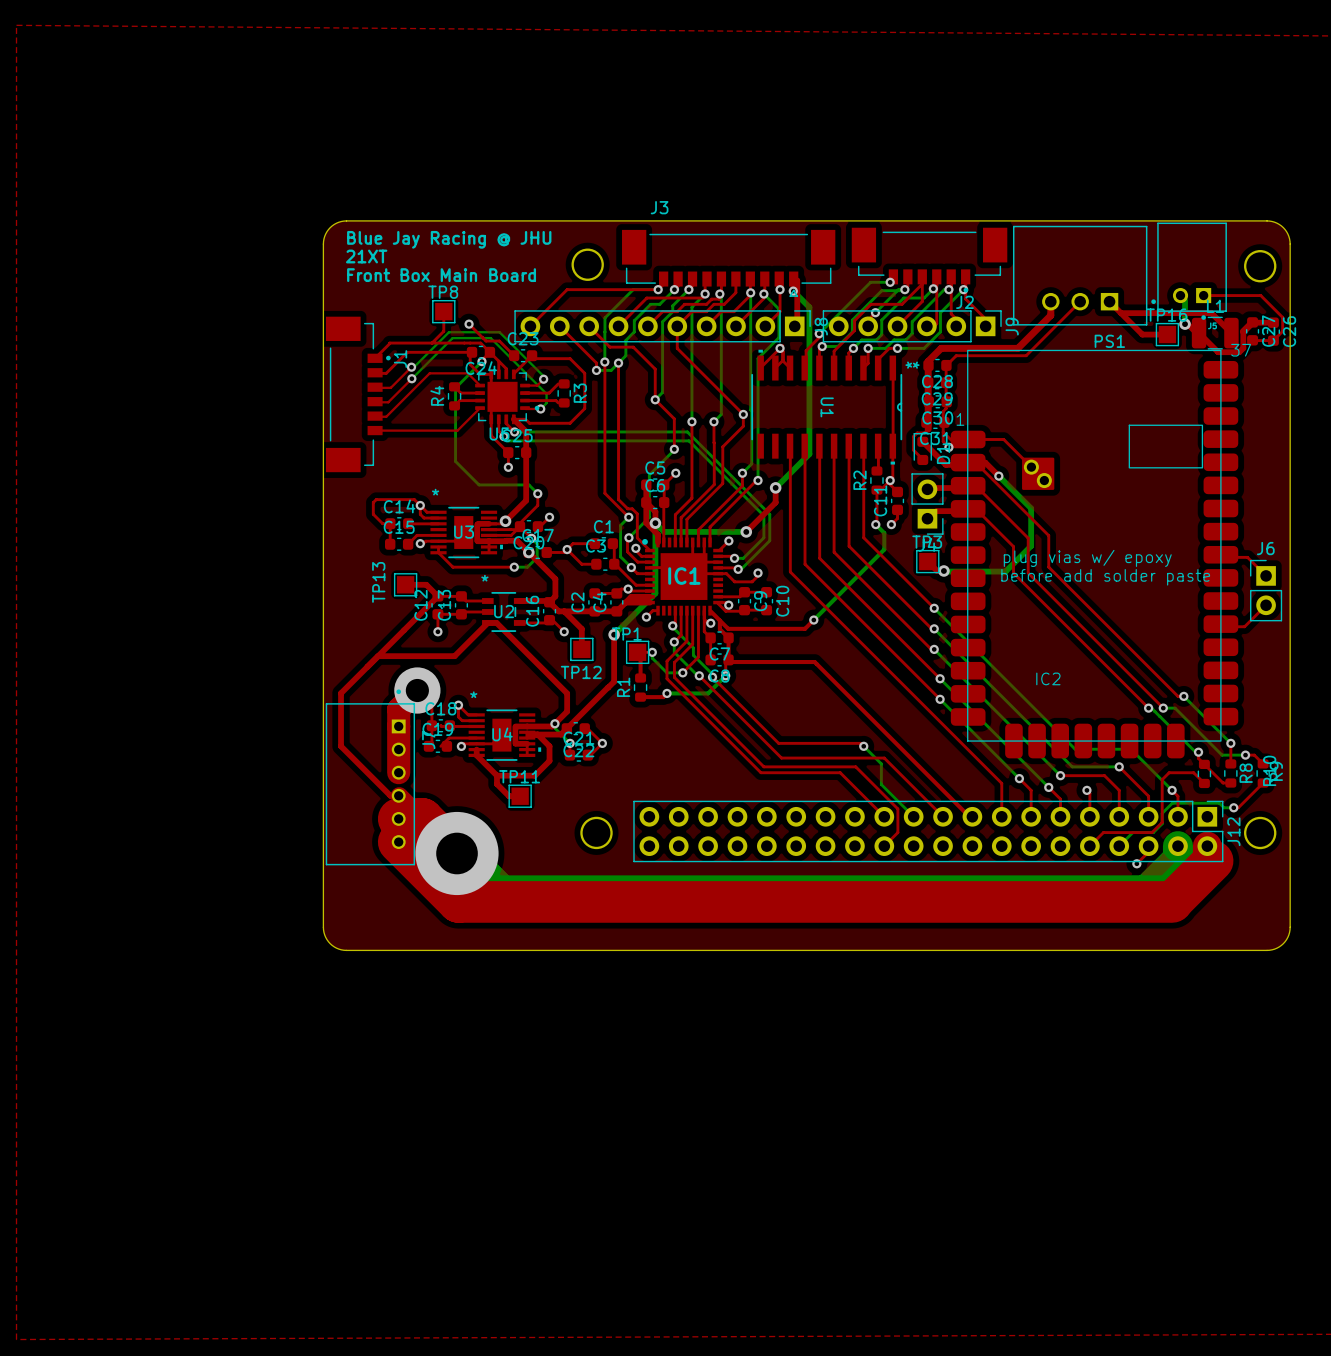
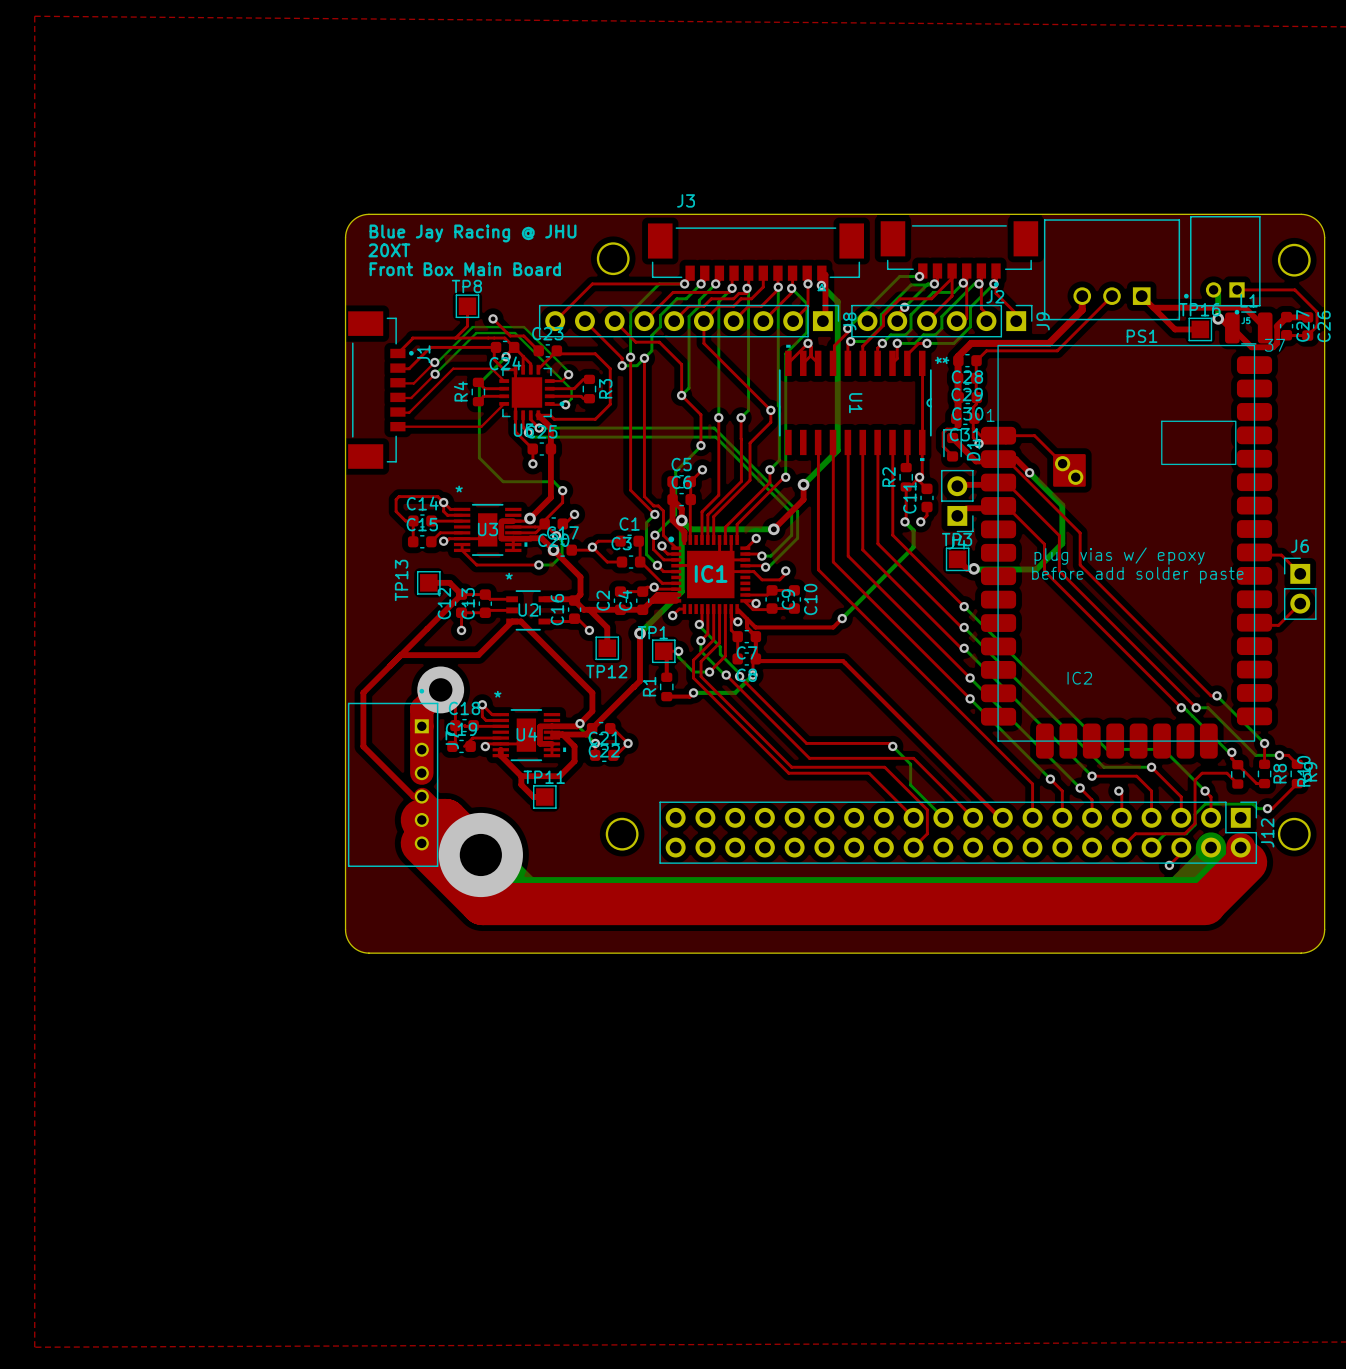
text: 21XT (366, 256) -> 20XT (389, 250)

